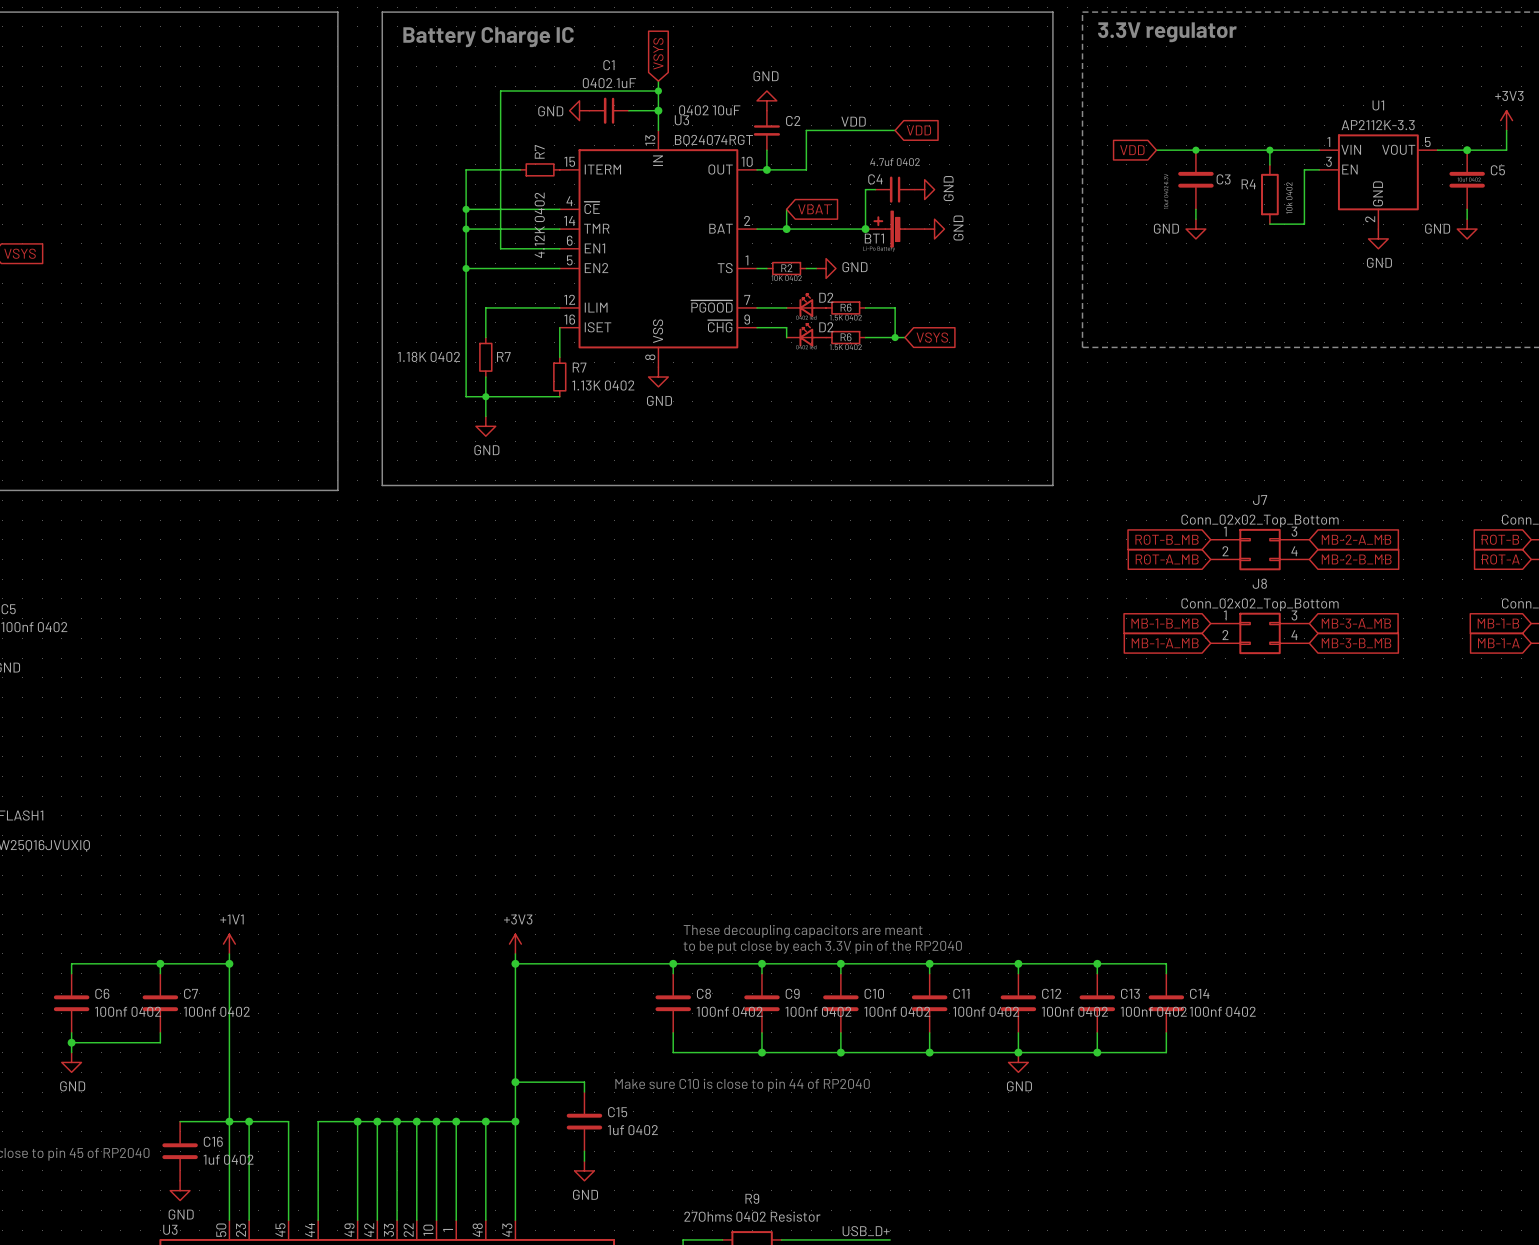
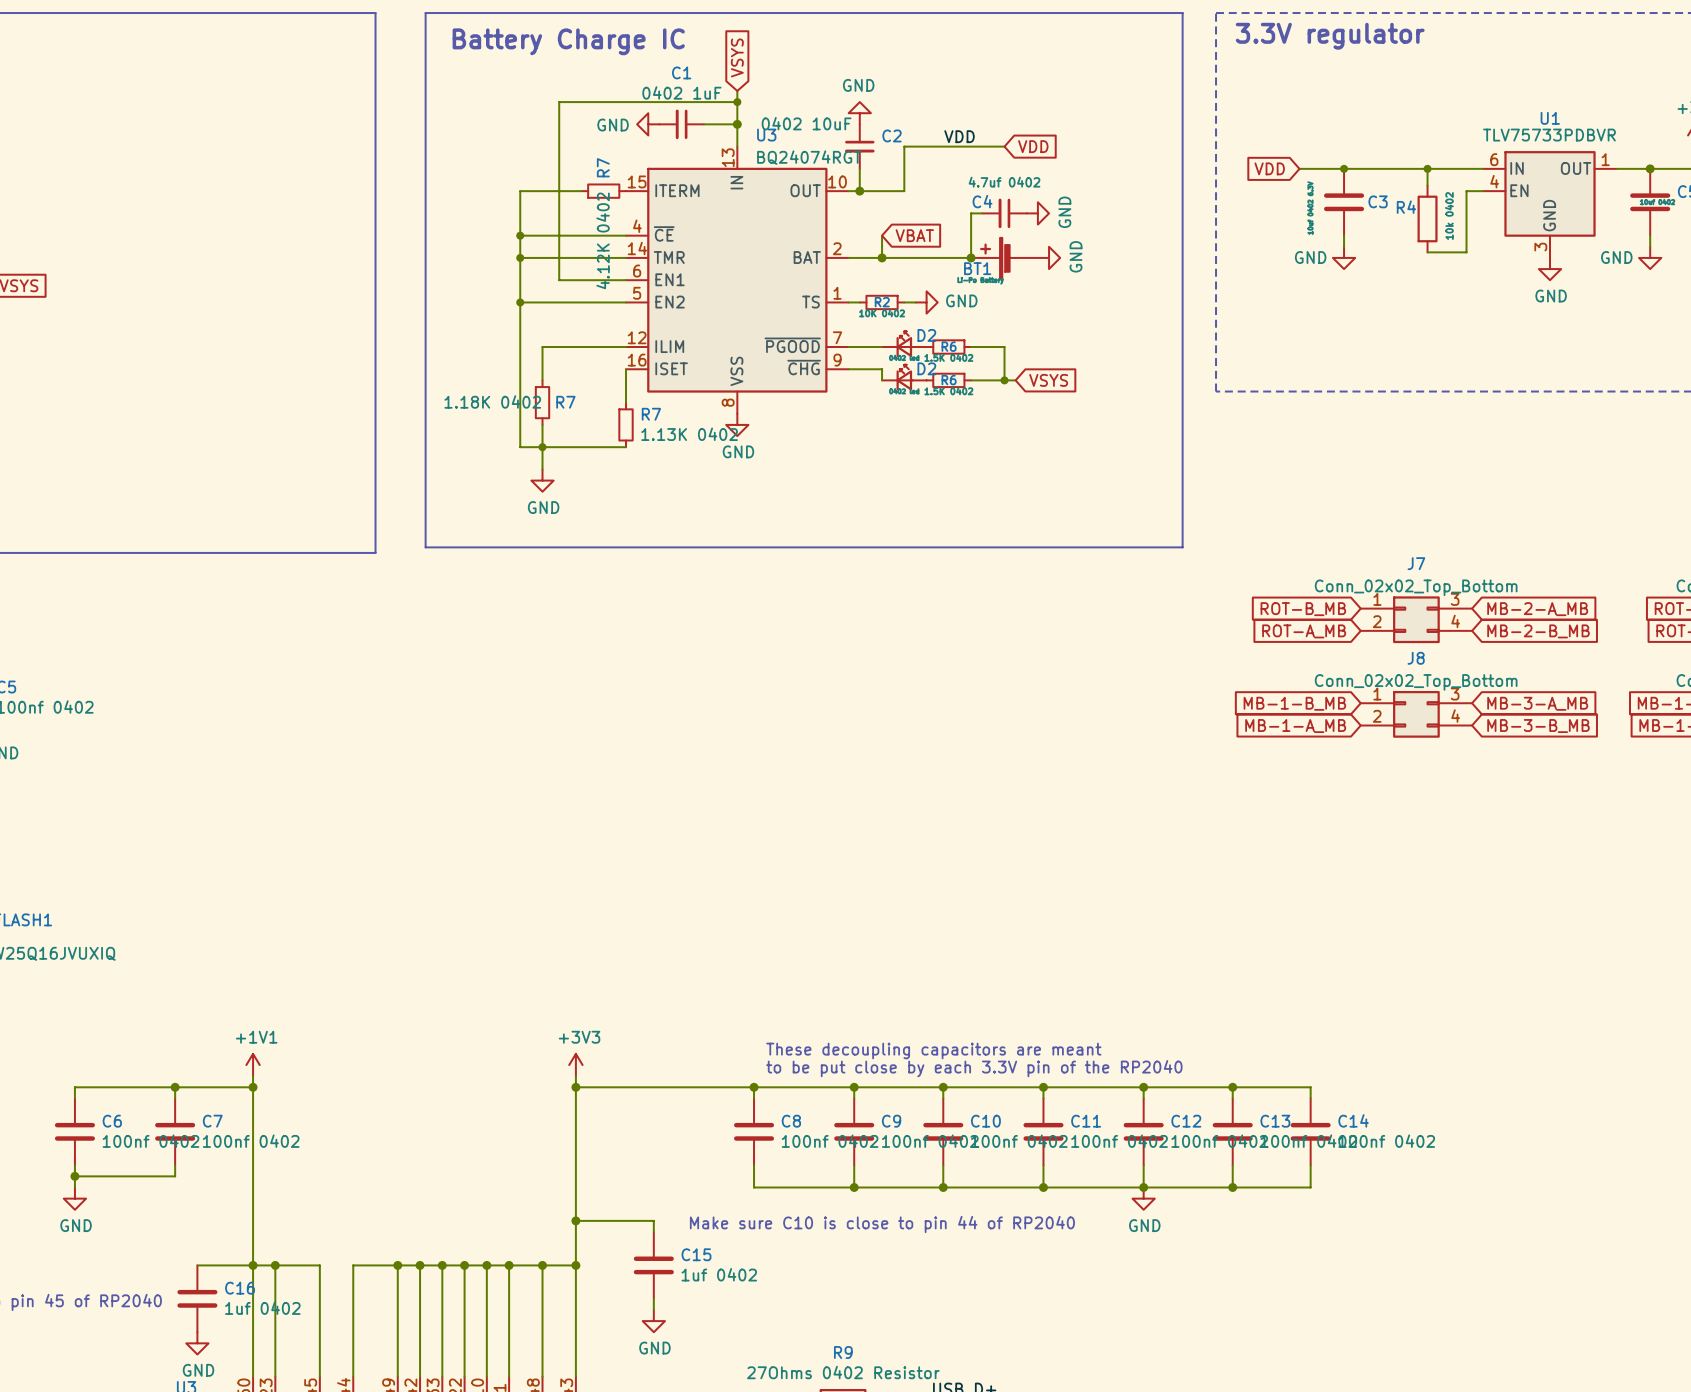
U1 value: AP2112K-3.3 (1378, 125) -> TLV75733PDBVR (1549, 135)
U1 pin number: 1 (1328, 142) -> 6 (1494, 159)
U1 pin number: 5 (1427, 142) -> 1 (1605, 159)
U1 pin name: VIN (1351, 149) -> IN (1517, 168)
U1 pin name: VOUT (1398, 149) -> OUT (1576, 168)
U1 pin number: 3 (1328, 161) -> 4 (1494, 181)
U1 pin number: 2 (1370, 219) -> 3 (1540, 247)

